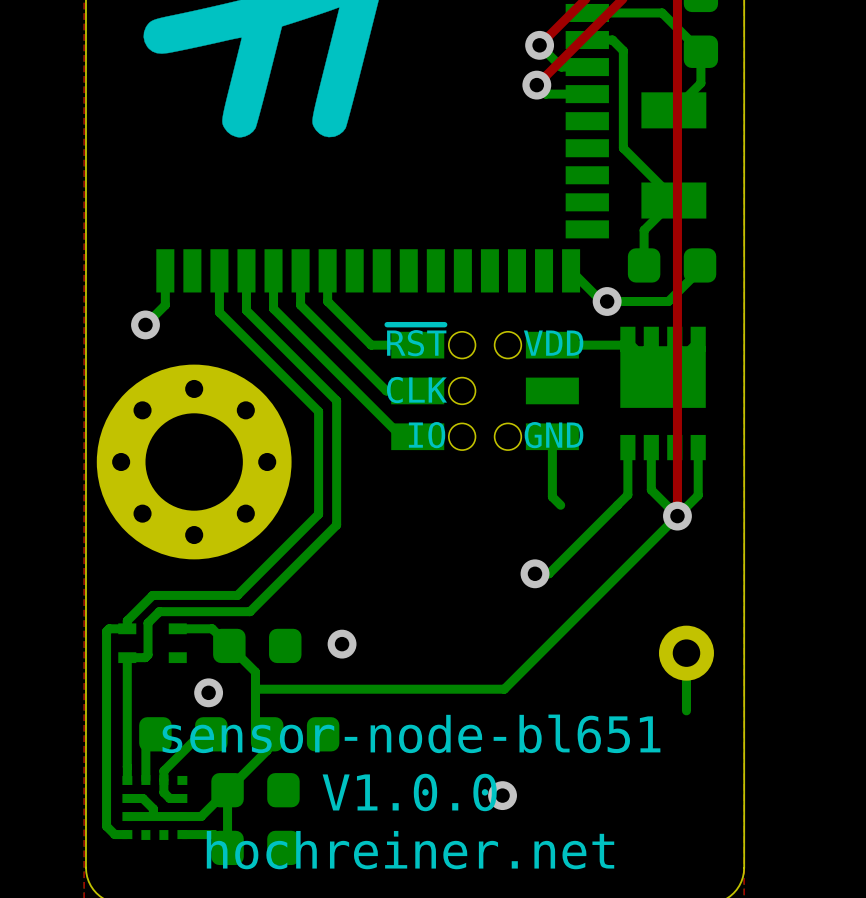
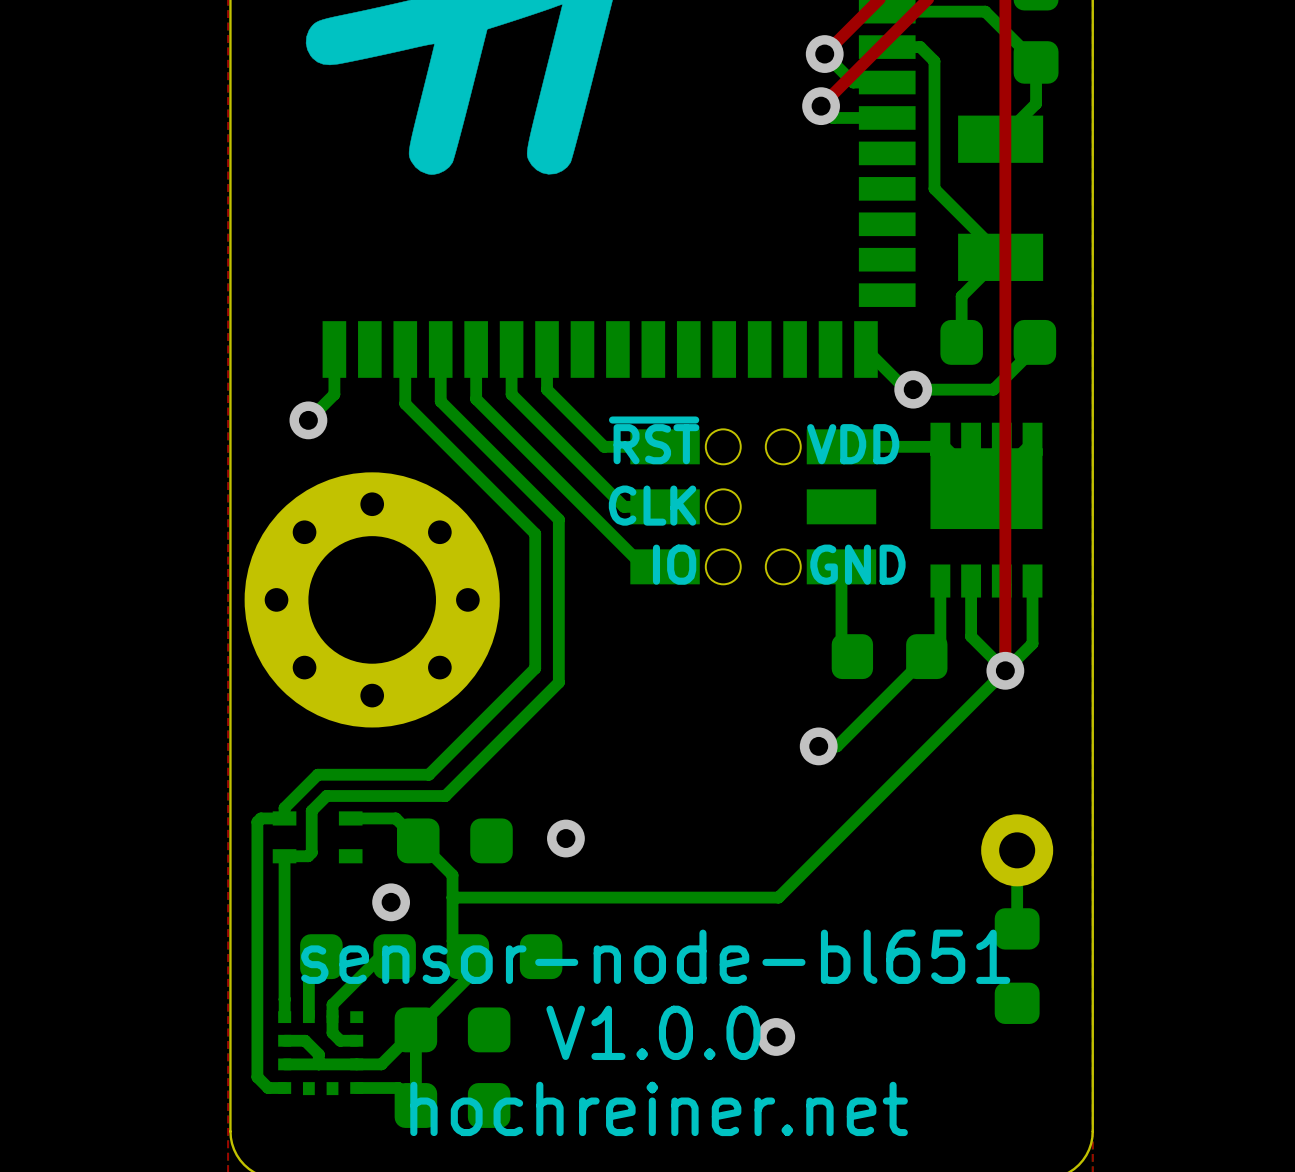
part: none -> (889, 656)
part: none -> (1017, 966)

